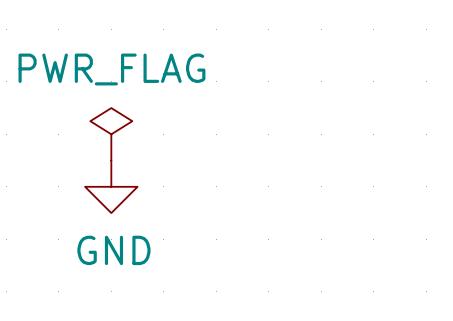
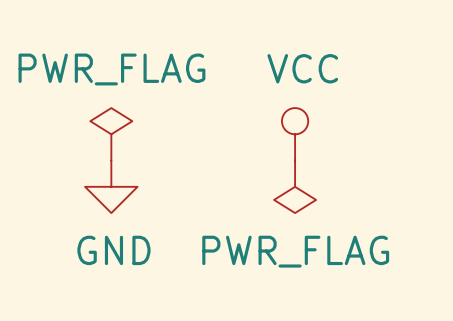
power symbol: none -> VCC (295, 134)
power symbol: none -> PWR_FLAG (295, 186)

